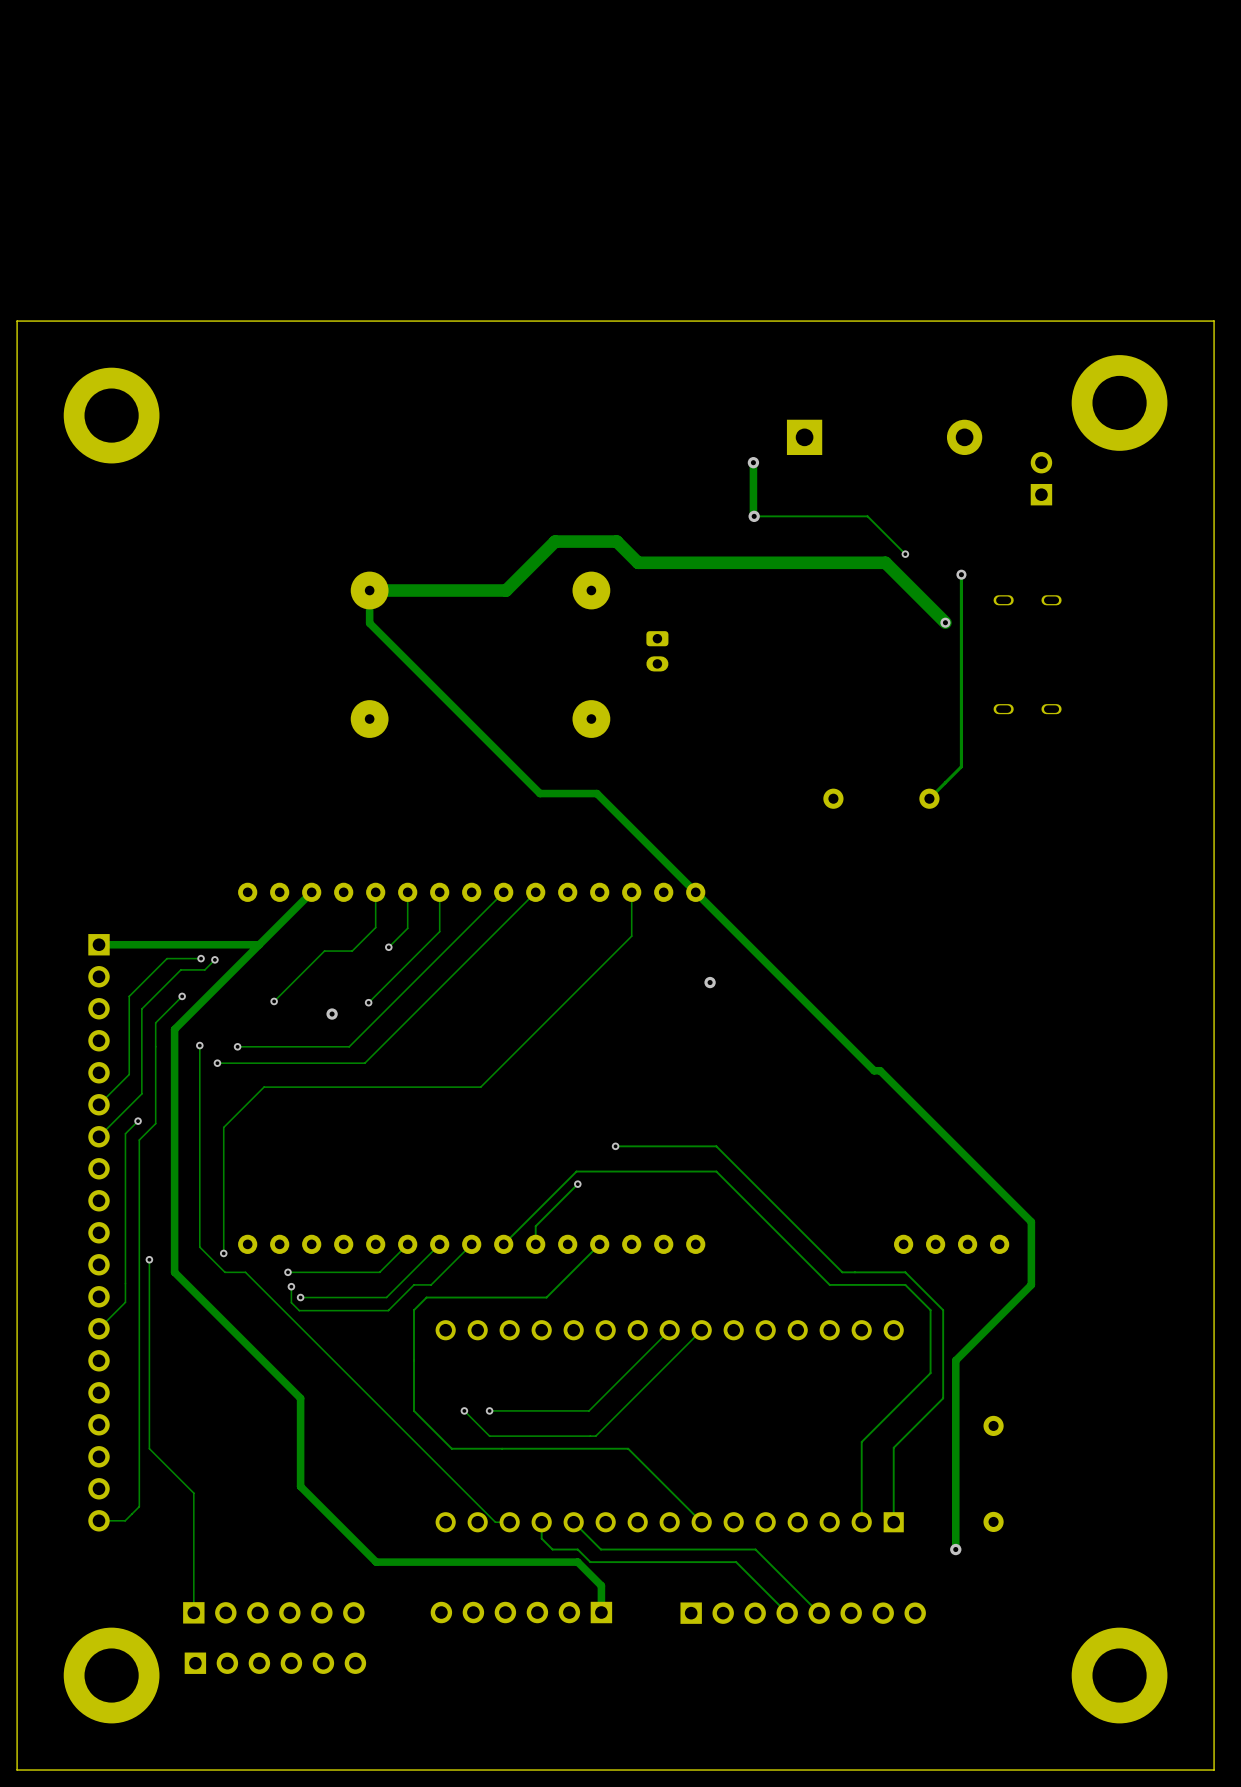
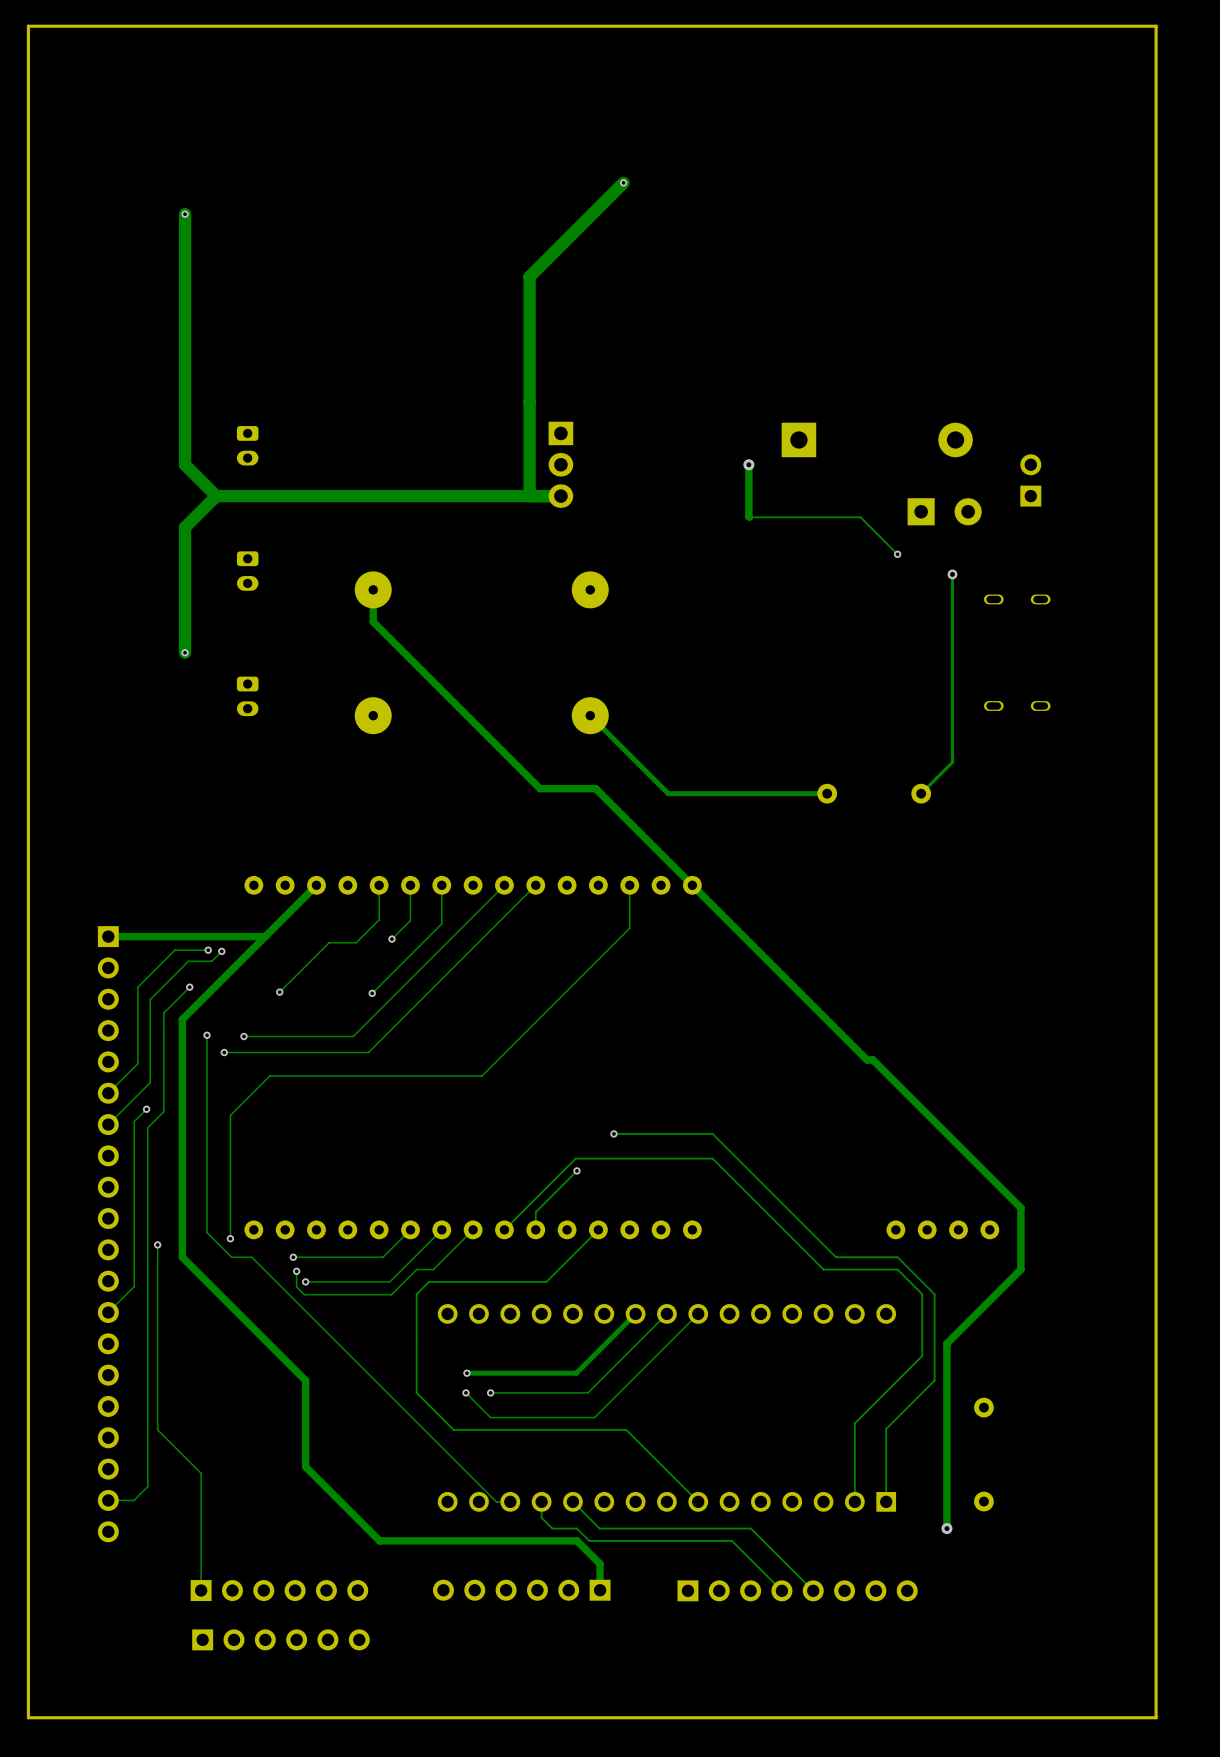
track: none -> (623, 182) (529, 276) (529, 496)
via: none -> (623, 182)
track: none -> (185, 214) (185, 464) (216, 496)
via: none -> (185, 214)
board edge: (1214, 321) (17, 321) (17, 1770) (1214, 1770) (1214, 321) -> (1156, 26) (1156, 1717) (28, 1717) (28, 26) (1156, 26)
part: (1119, 402) -> none
part: (111, 415) -> none
part: none -> (247, 445)
part: none -> (560, 464)
track: none -> (216, 496) (185, 527) (185, 652)
track: none -> (560, 496) (216, 496)
part: none -> (944, 511)
via: (754, 516) -> none
part: none -> (247, 571)
track: (369, 590) (506, 590) (555, 541) (616, 541) (638, 562) (885, 562) (945, 622) -> none
via: (945, 622) -> none
part: (657, 651) -> none
via: none -> (185, 652)
part: none -> (247, 696)
track: none -> (590, 715) (668, 793) (827, 793)
via: (710, 982) -> none
via: (332, 1014) -> none
part: none -> (108, 1234)
track: none -> (635, 1313) (576, 1373) (466, 1373)
via: none -> (466, 1373)
part: (111, 1675) -> none
part: (1119, 1675) -> none

